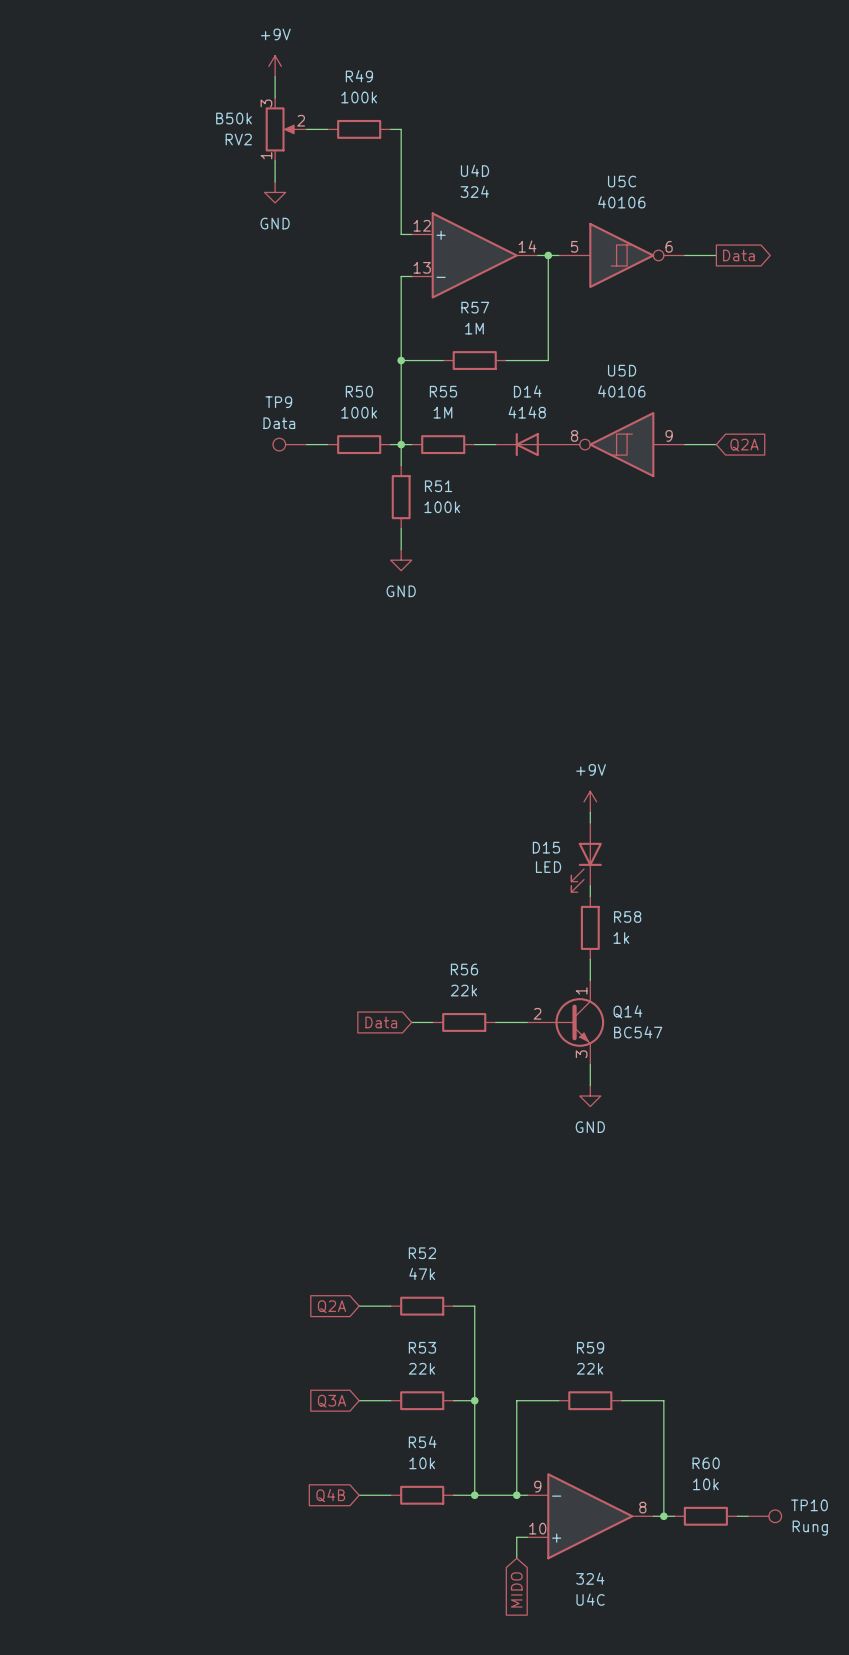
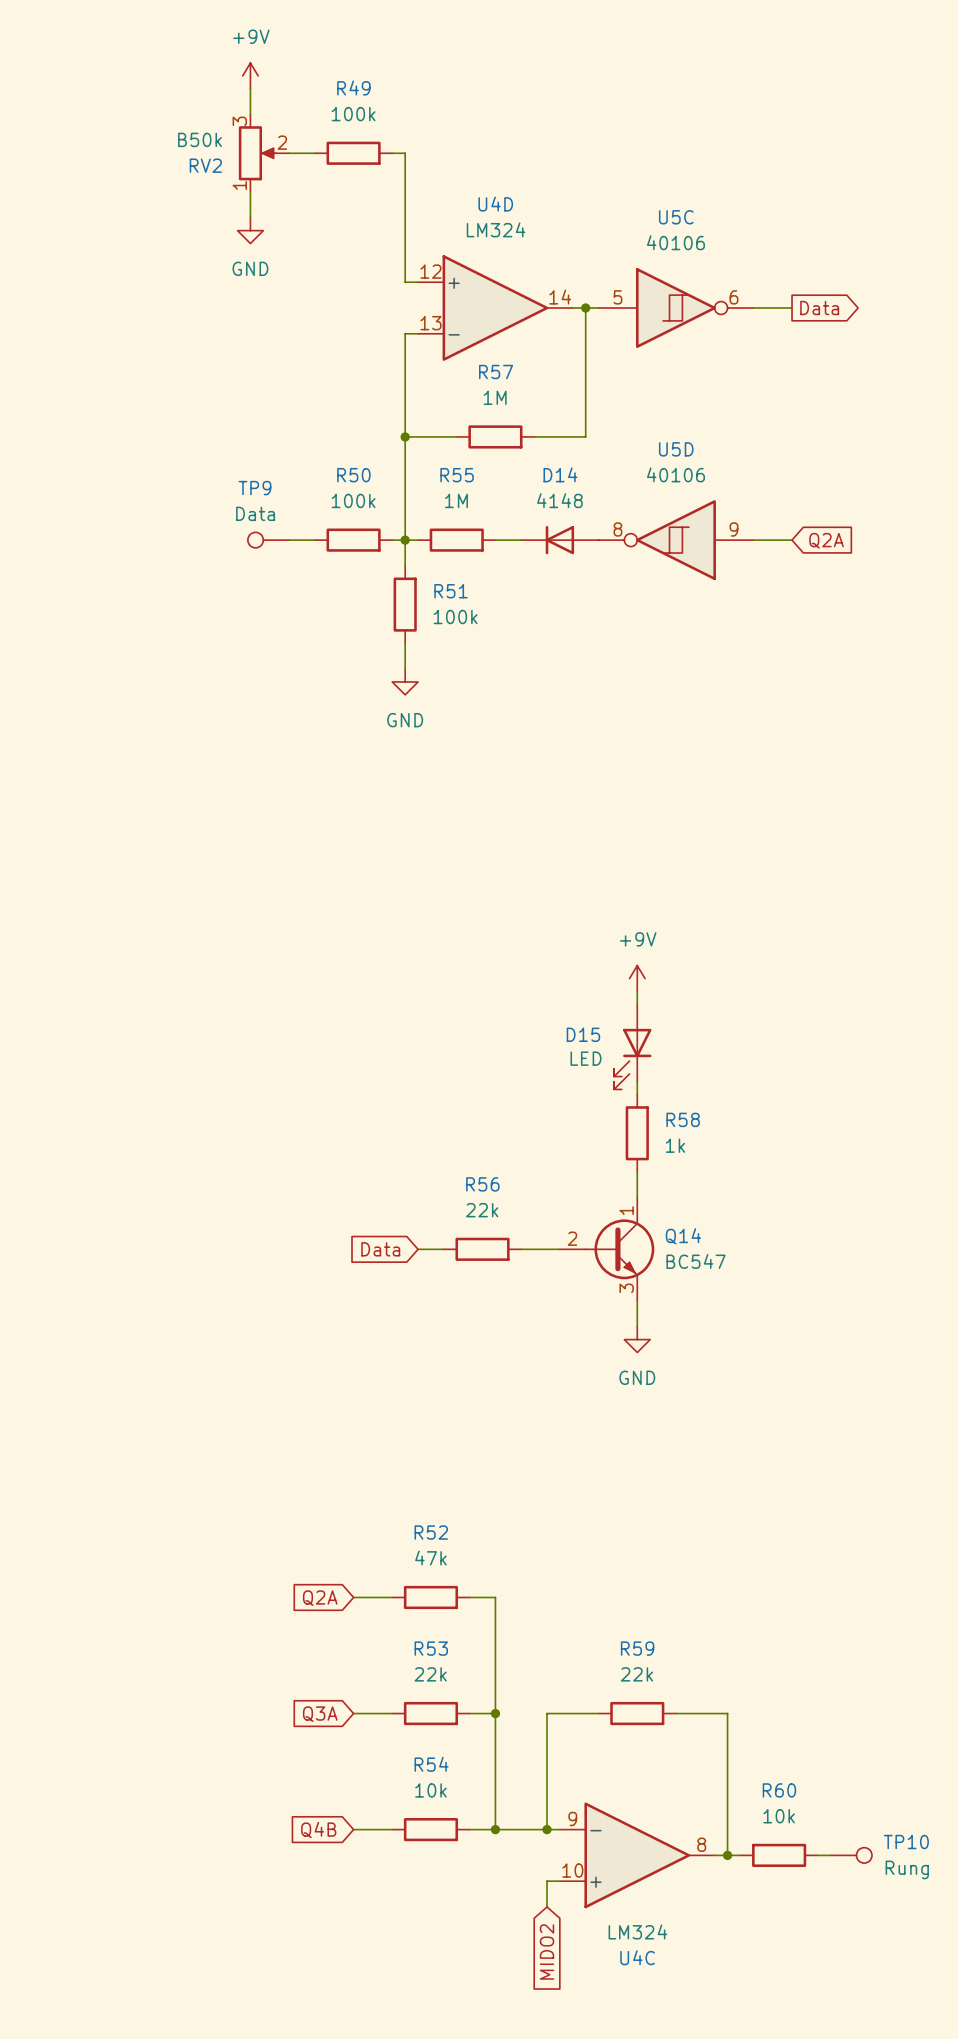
U4D value: 324 (474, 191) -> LM324 (496, 229)
U4C value: 324 (590, 1578) -> LM324 (637, 1931)
global label: MIDO (516, 1589) -> MIDO2 (547, 1951)

